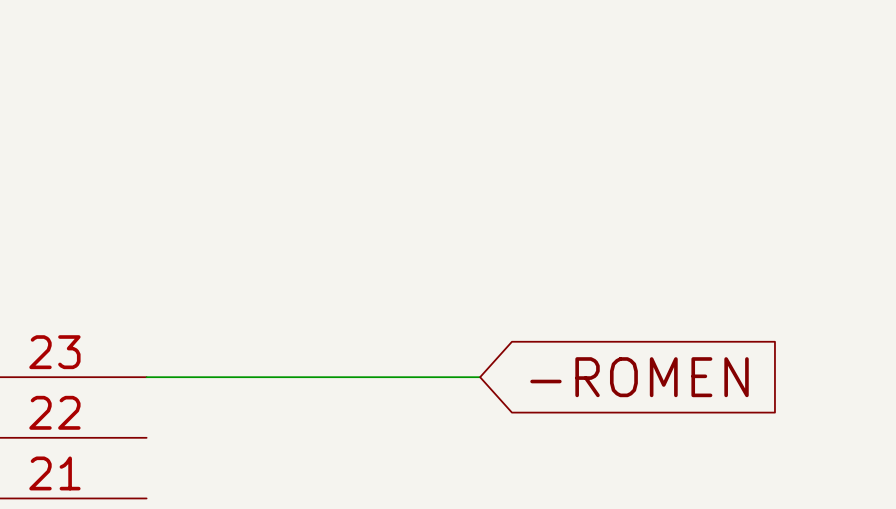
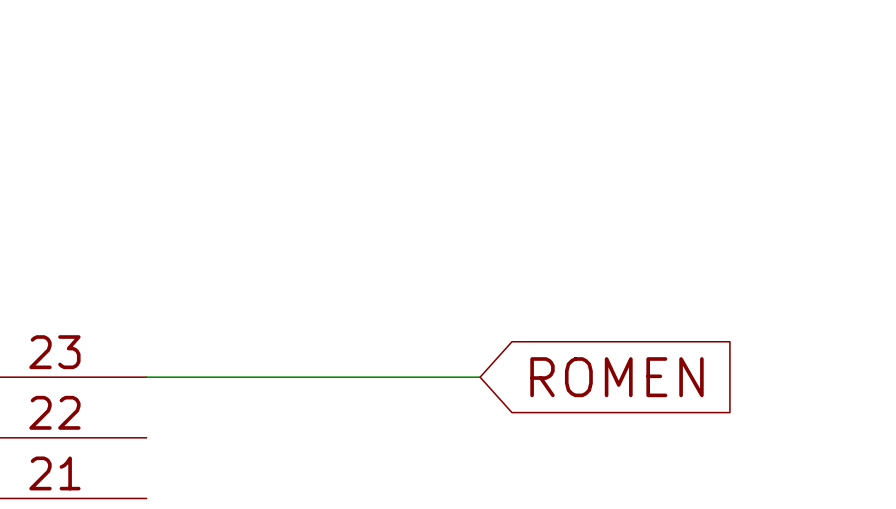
global label: -ROMEN (639, 377) -> ROMEN (616, 377)

